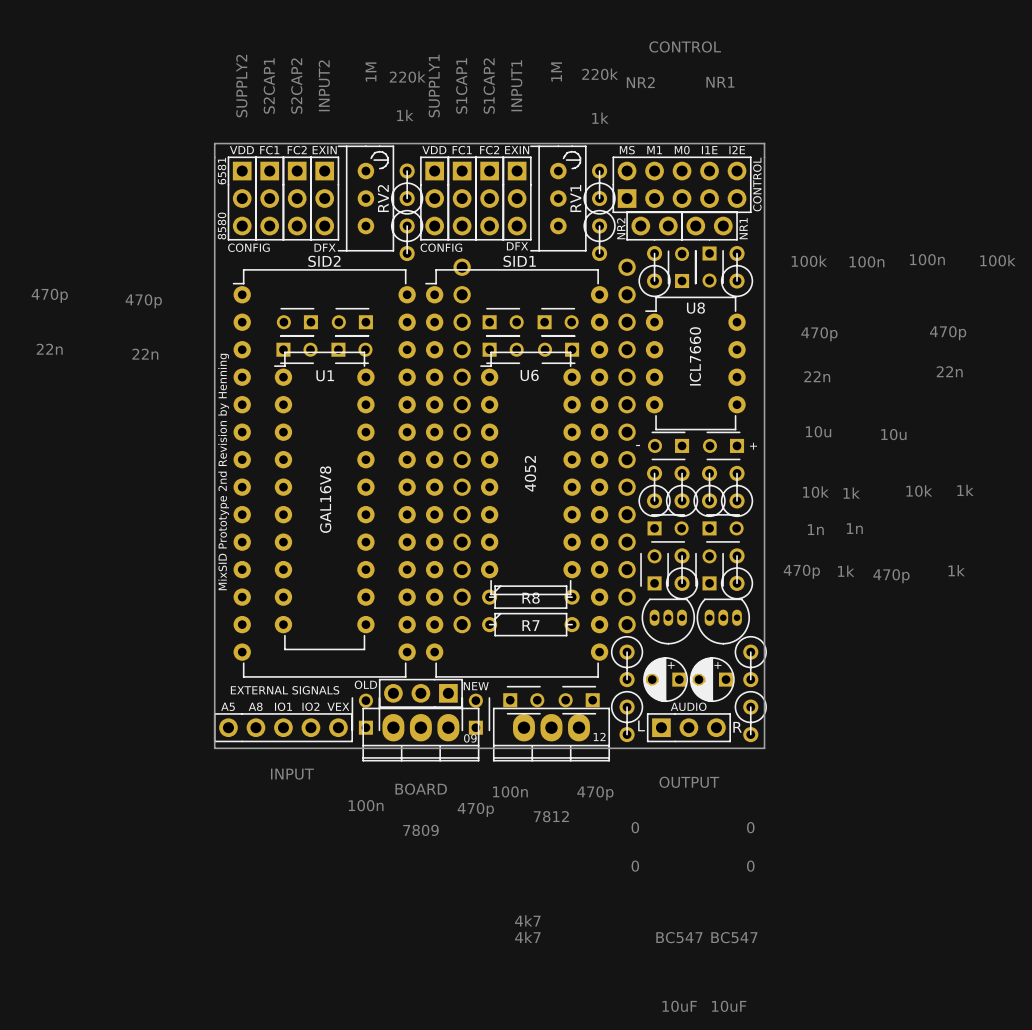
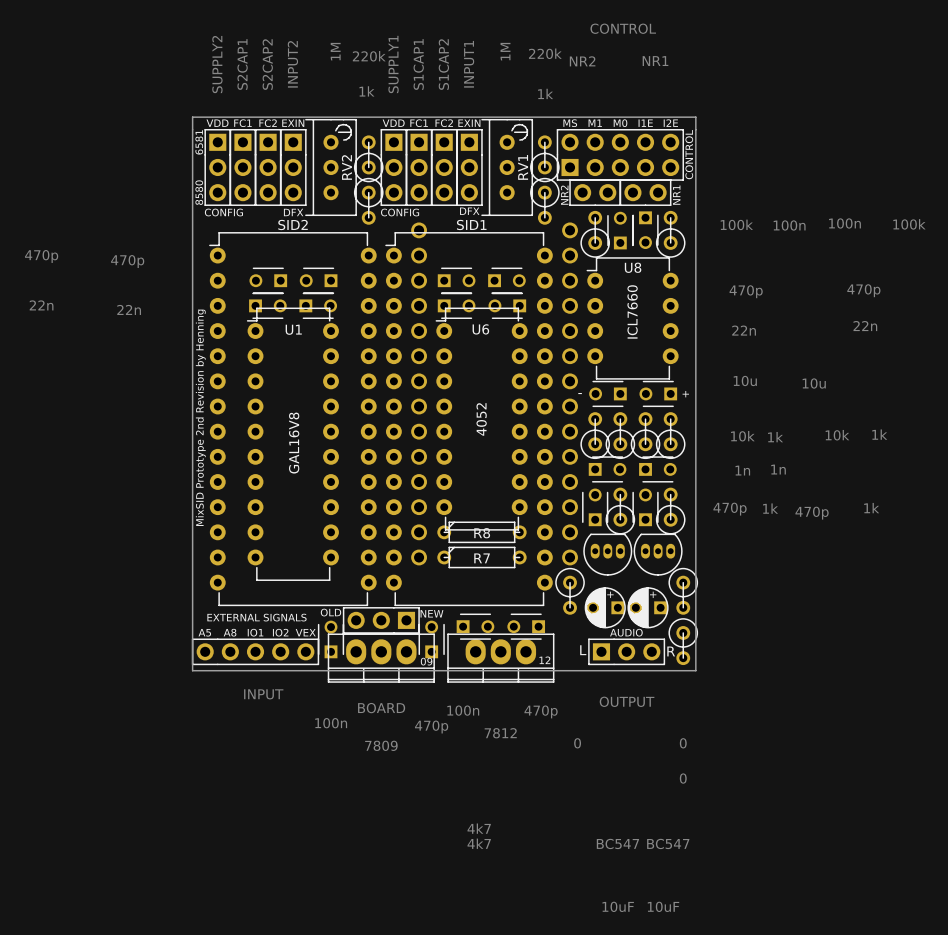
part: 0 (627, 716) -> none

